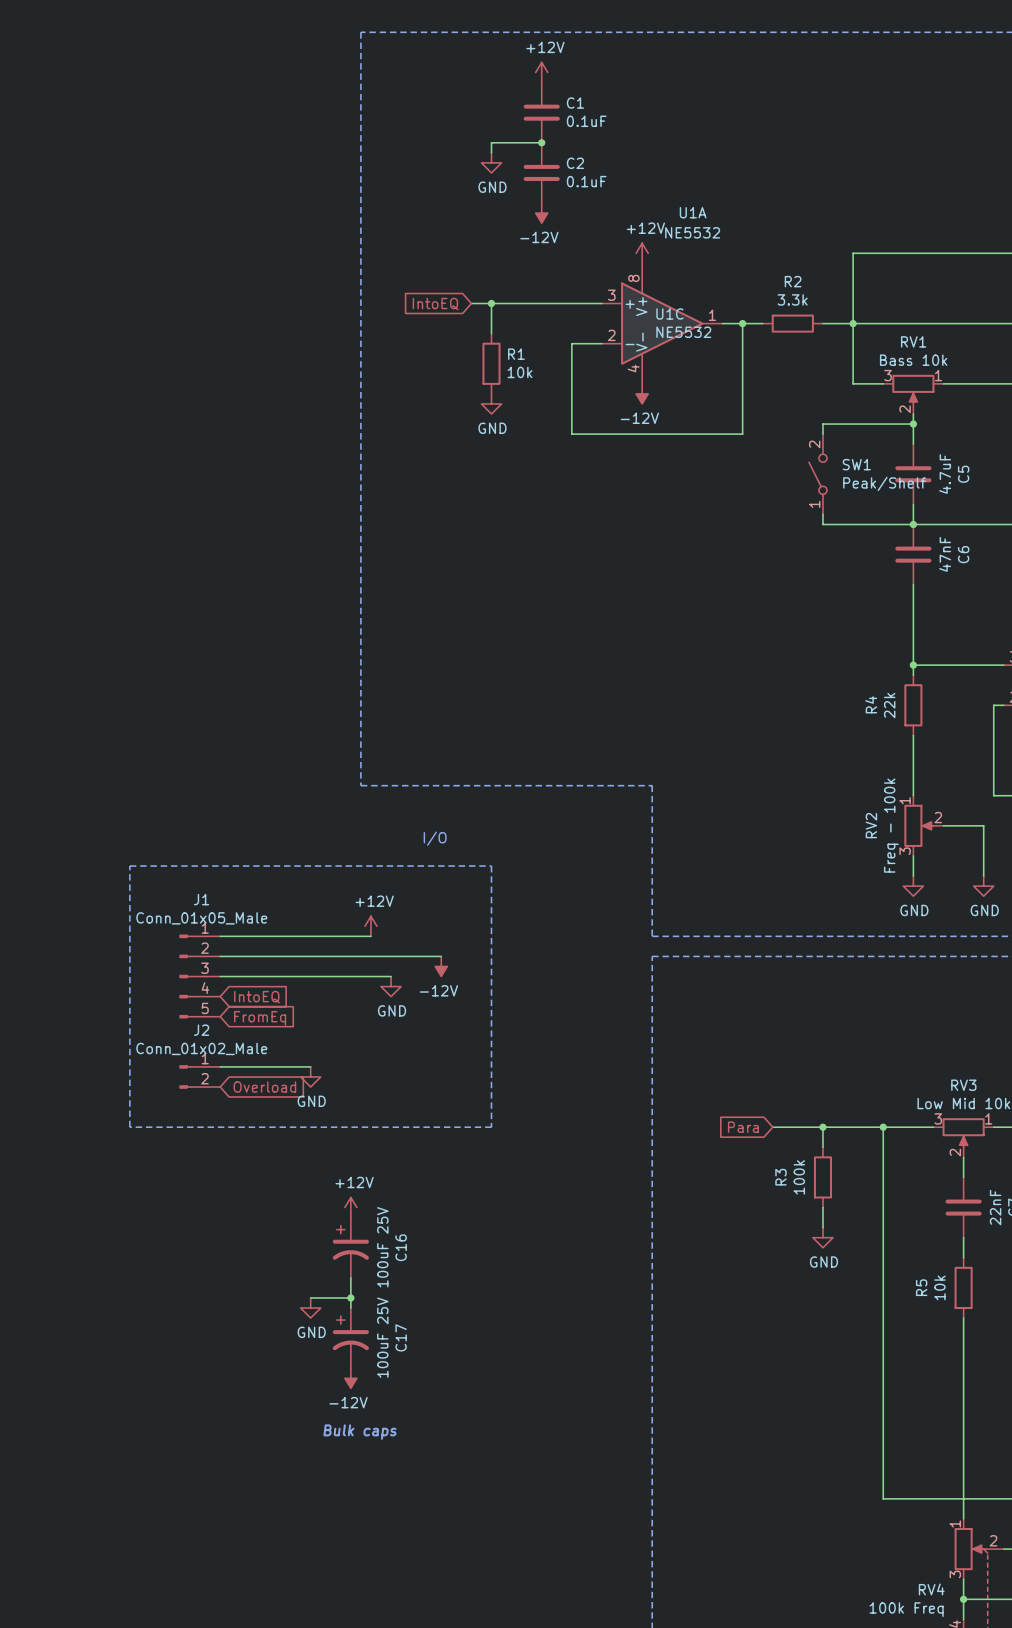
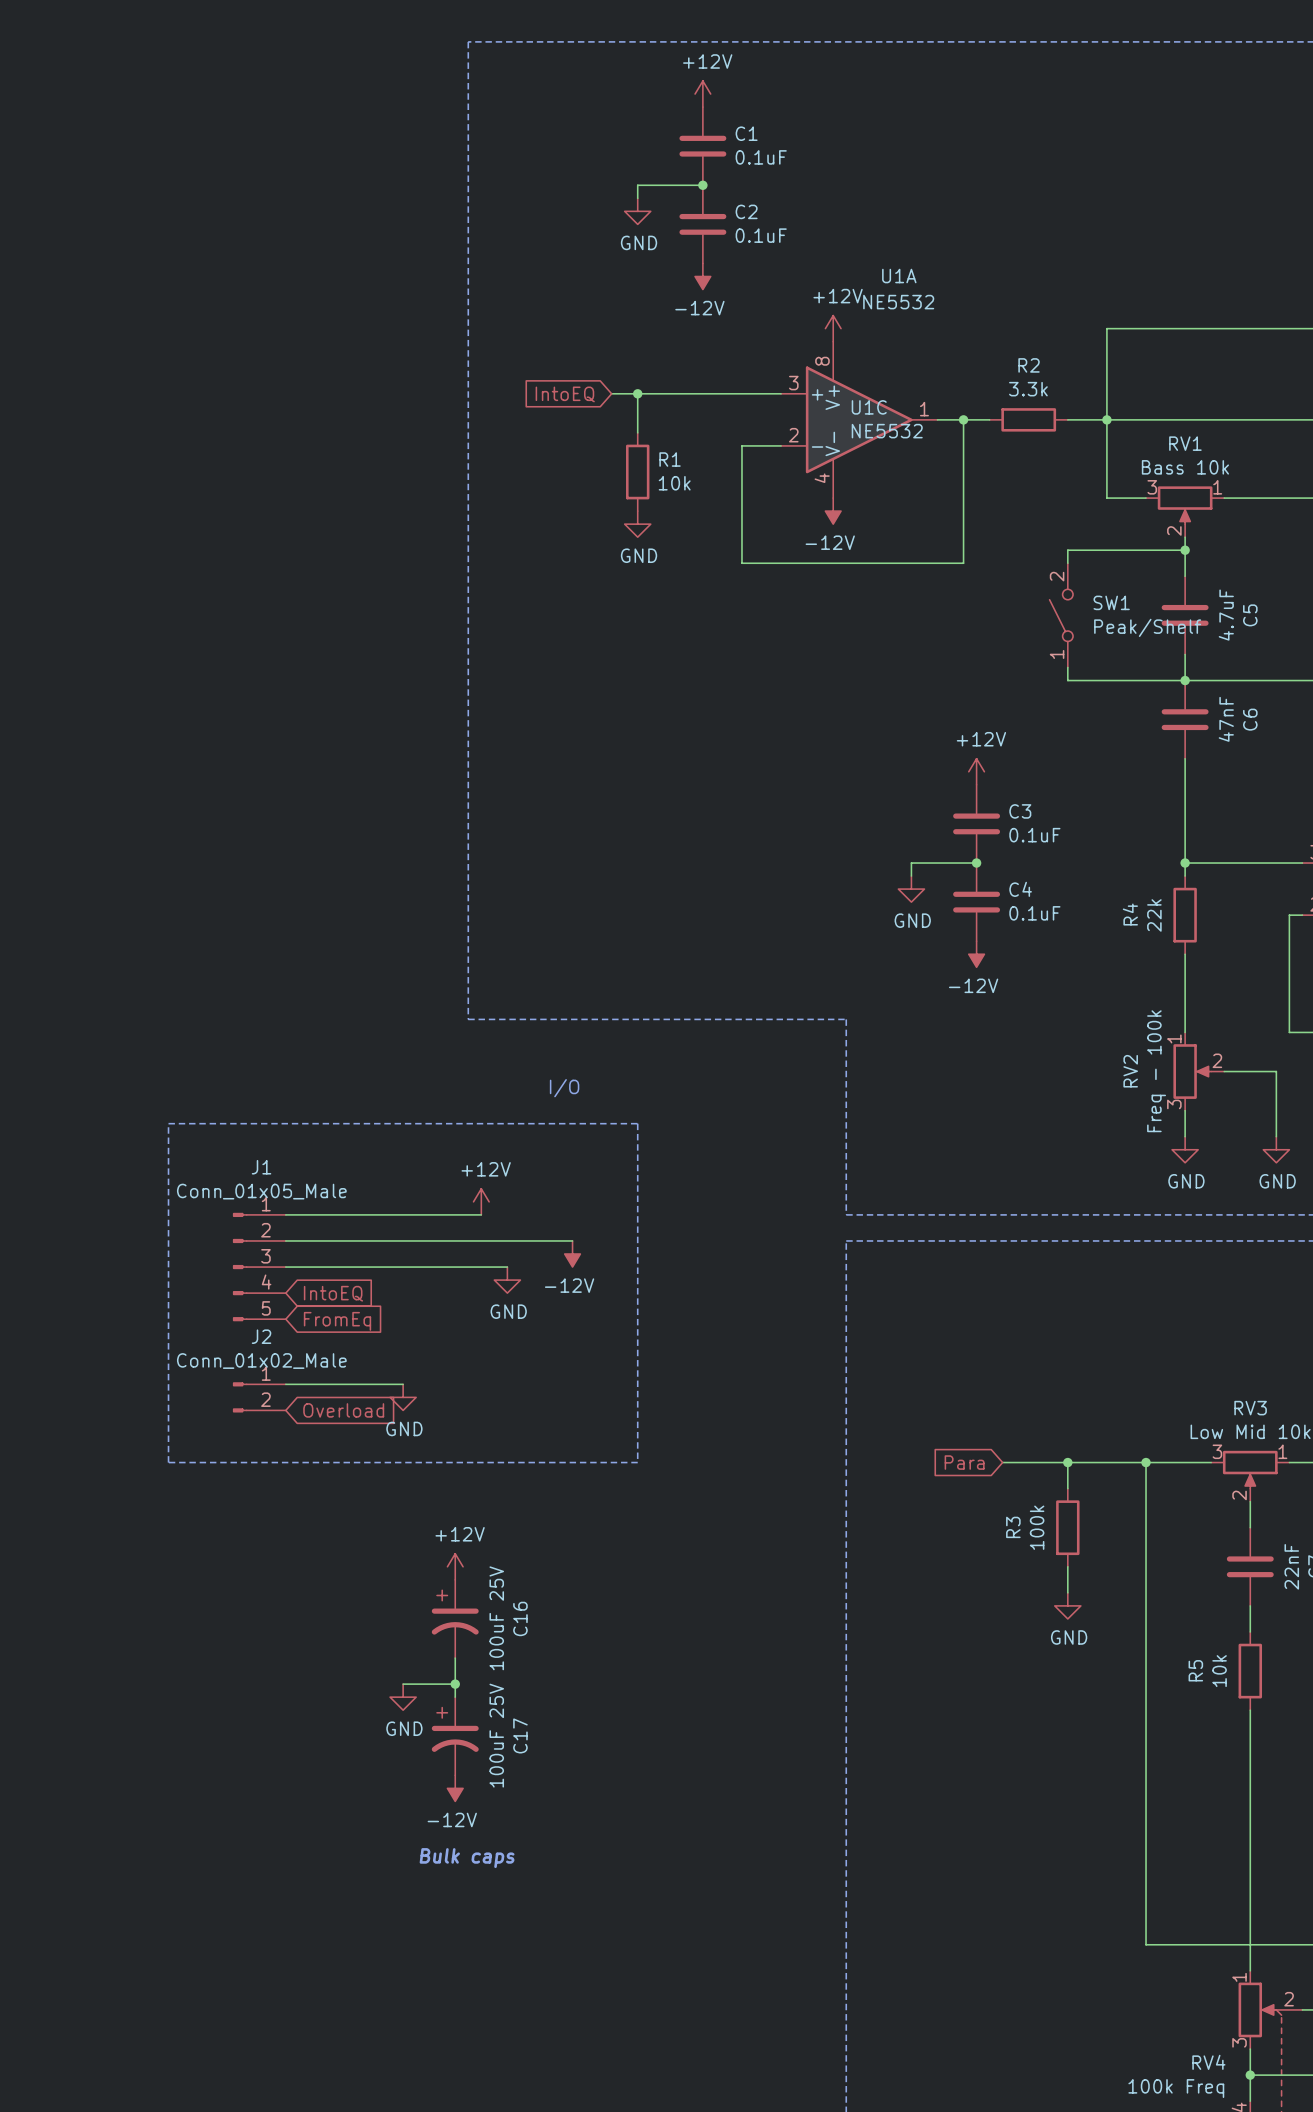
power symbol: none -> +12V (976, 771)
C3: none -> 0.1uF (976, 823)
wire: none -> (976, 863) (911, 863) (911, 876)
junction: none -> (976, 863)
power symbol: none -> GND (911, 889)
C4: none -> 0.1uF (976, 902)
power symbol: none -> -12V (976, 954)

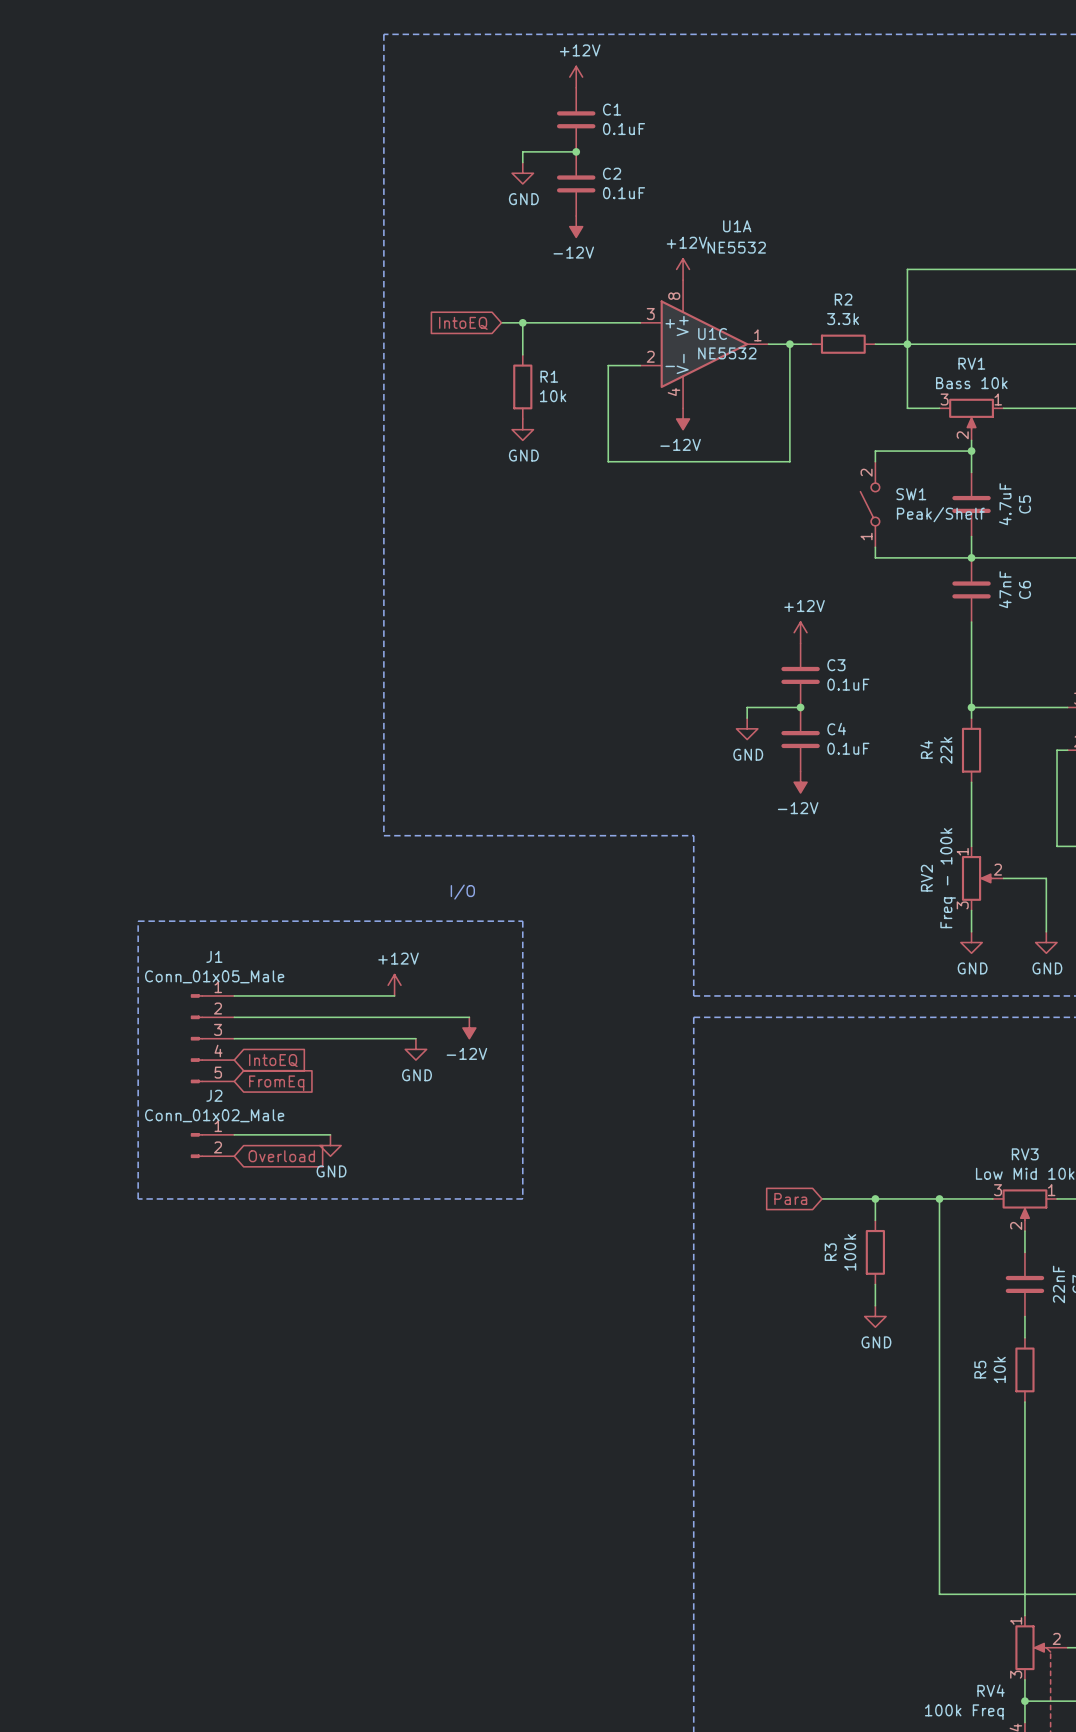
power symbol: +12V (455, 1566) -> none
C16: 100uF 25V (455, 1618) -> none
wire: (455, 1658) (455, 1697) -> none
wire: (403, 1684) (455, 1684) -> none
junction: (455, 1684) -> none
power symbol: GND (403, 1697) -> none
C17: 100uF 25V (455, 1736) -> none
power symbol: -12V (455, 1788) -> none
text: Bulk caps (467, 1858) -> none

